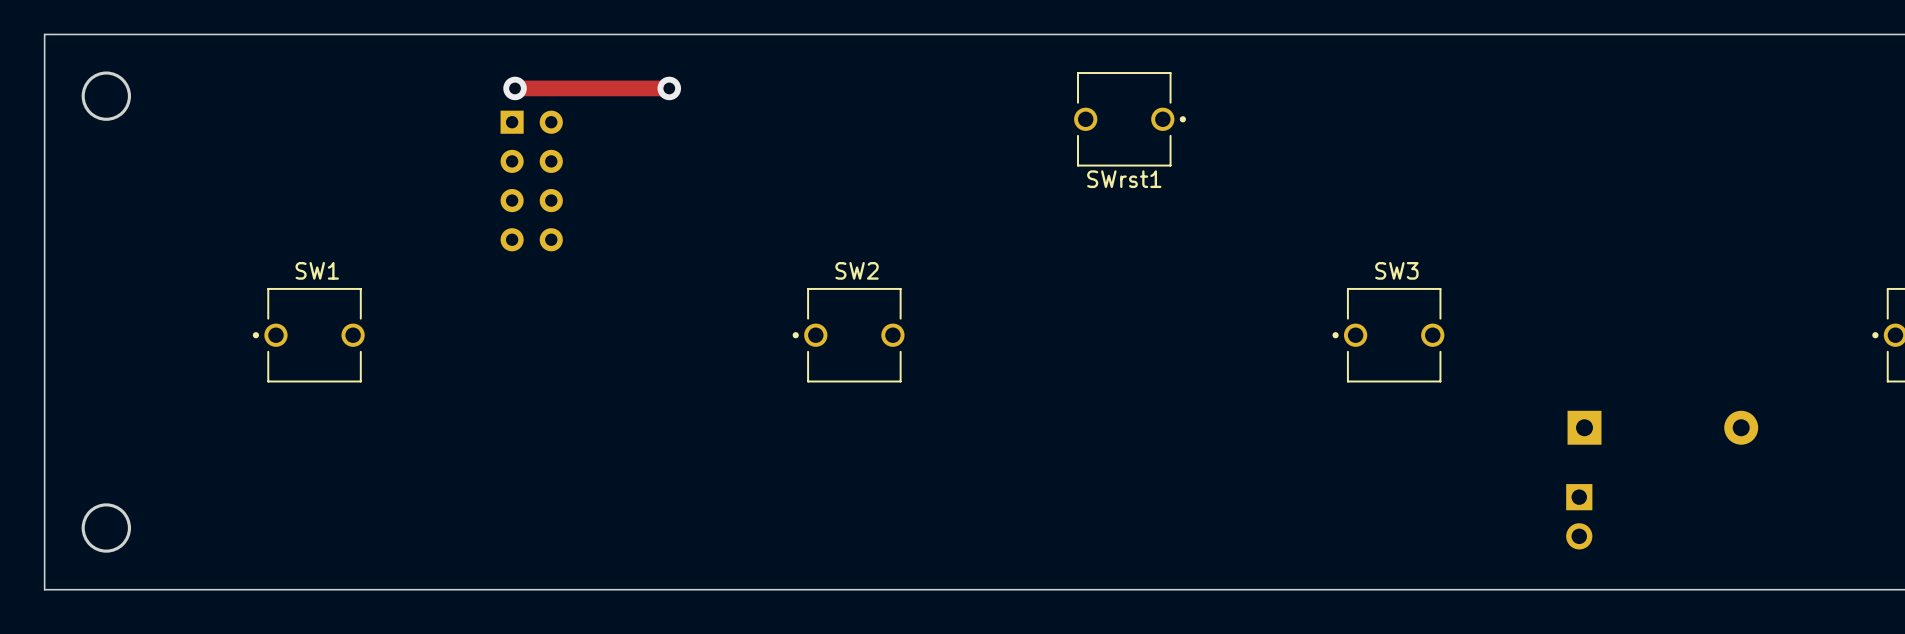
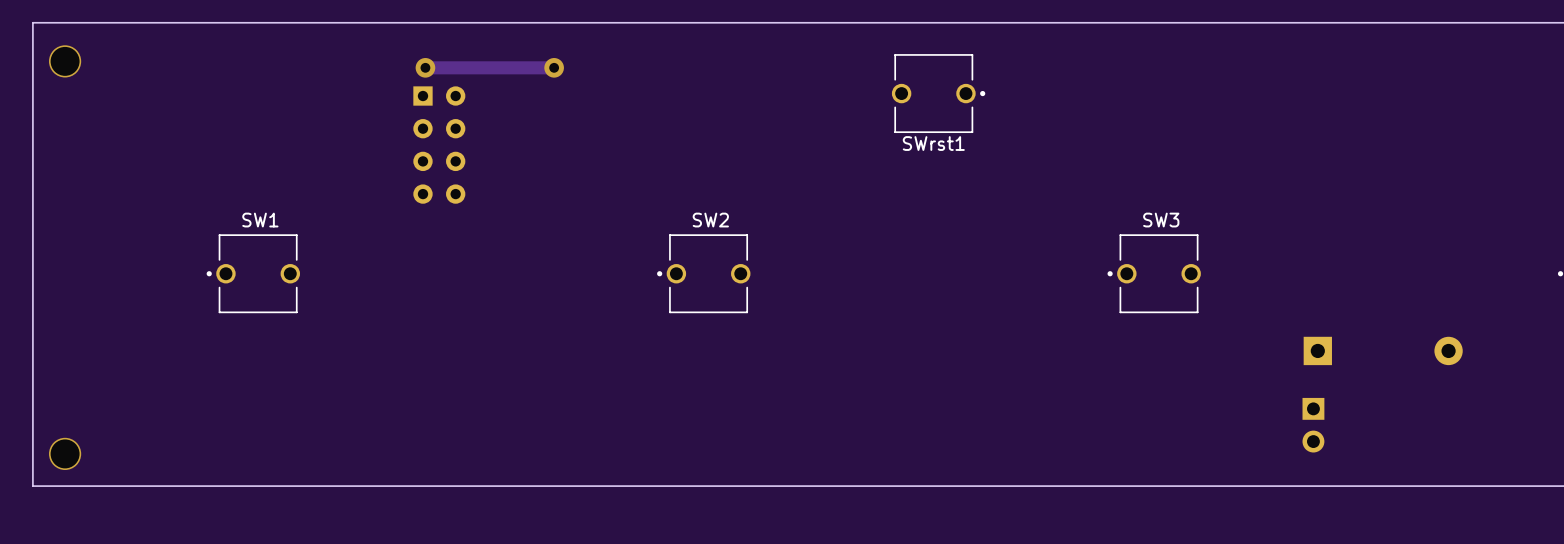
round board edge: [81, 71, 132, 121] -> none
via: none -> (65, 61)
round board edge: [81, 503, 132, 553] -> none
via: none -> (65, 453)

